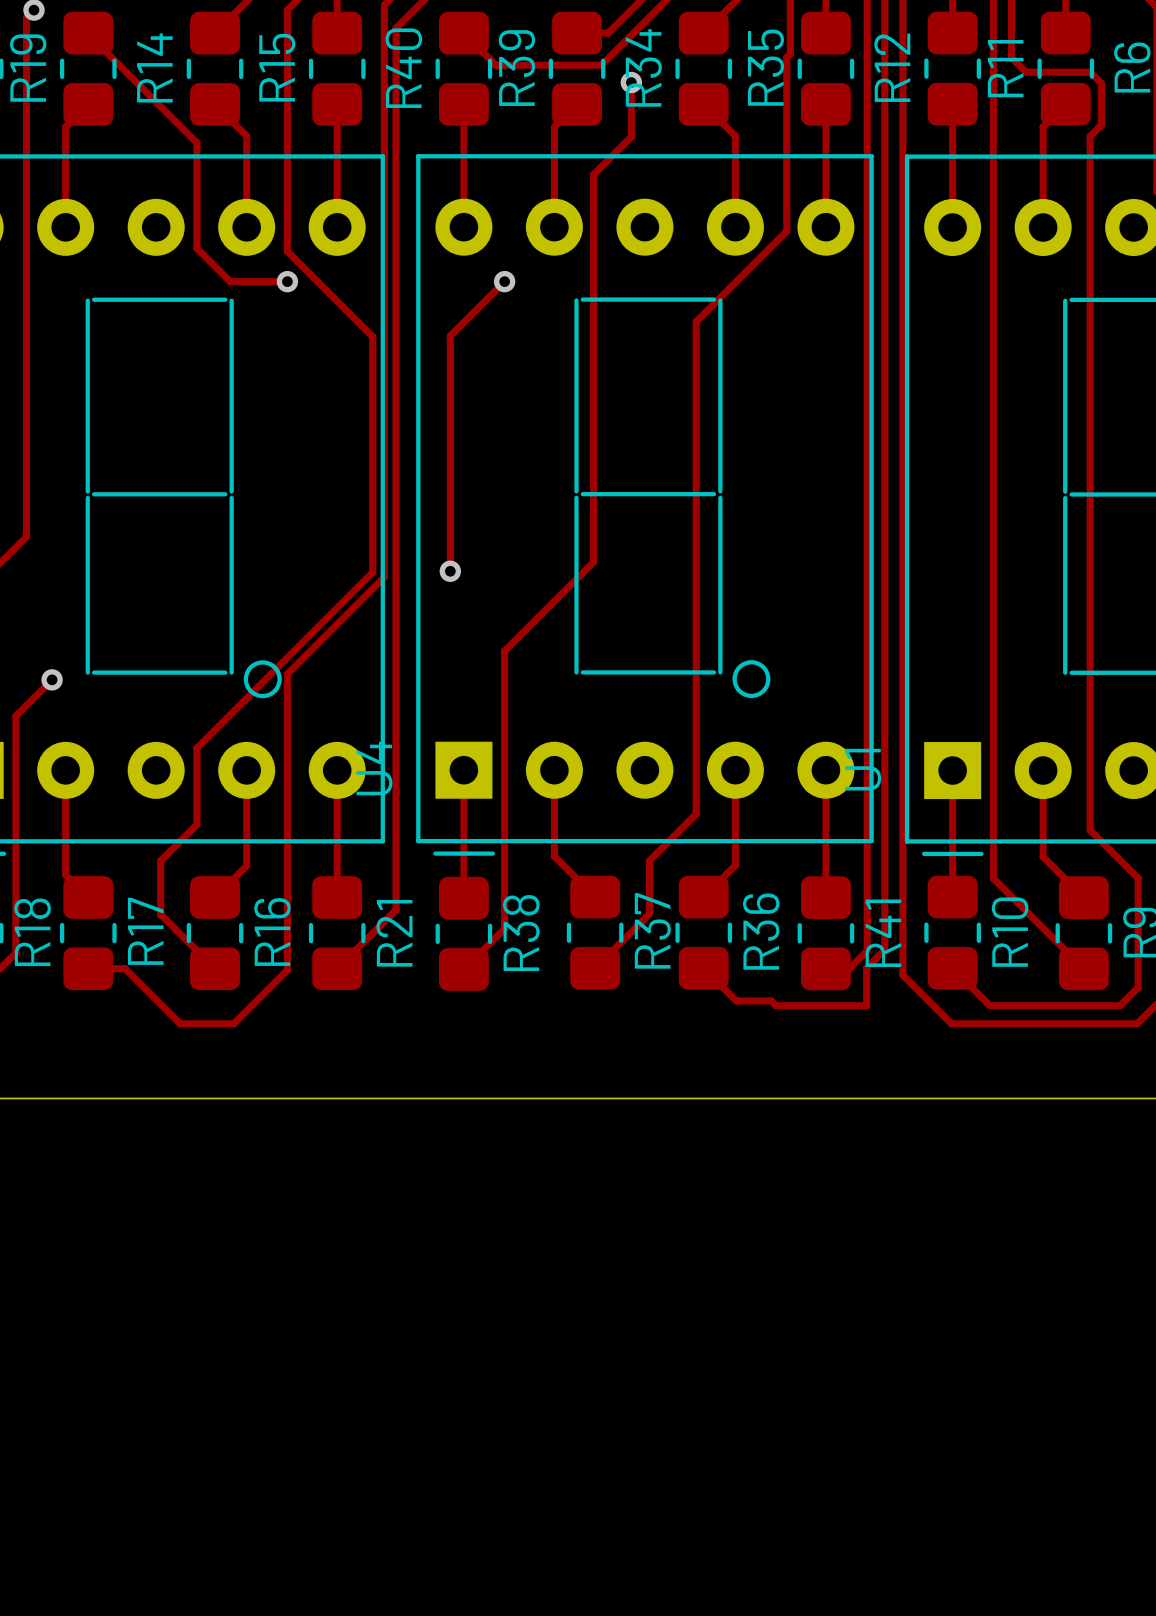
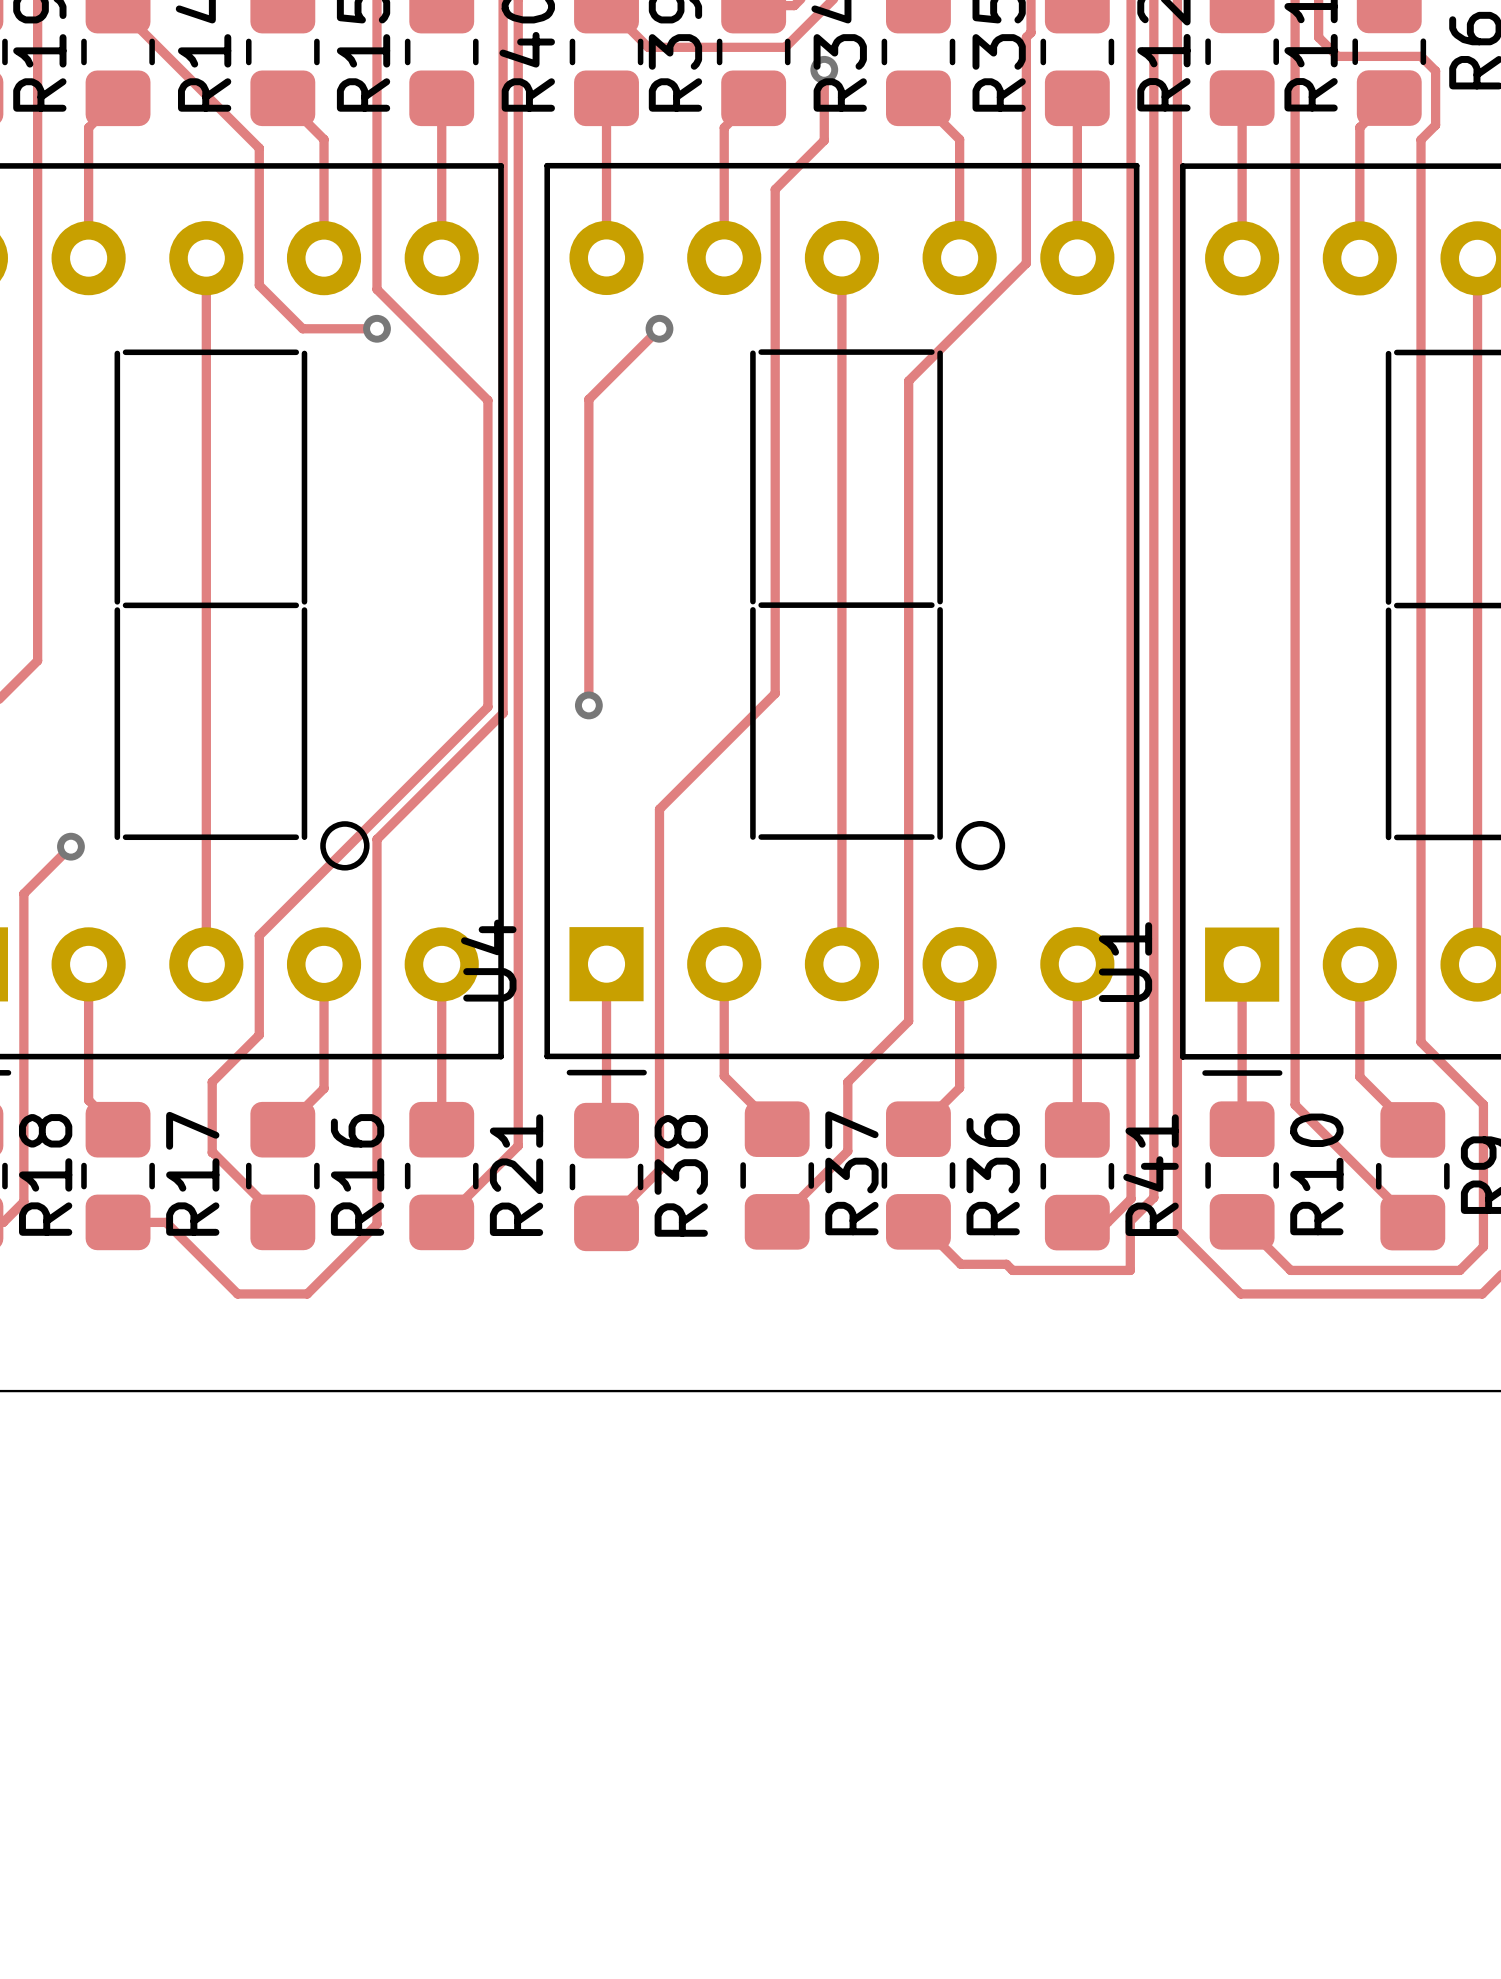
track: none -> (206, 258) (206, 964)
track: none -> (841, 257) (841, 964)
track: none -> (1477, 258) (1477, 964)

